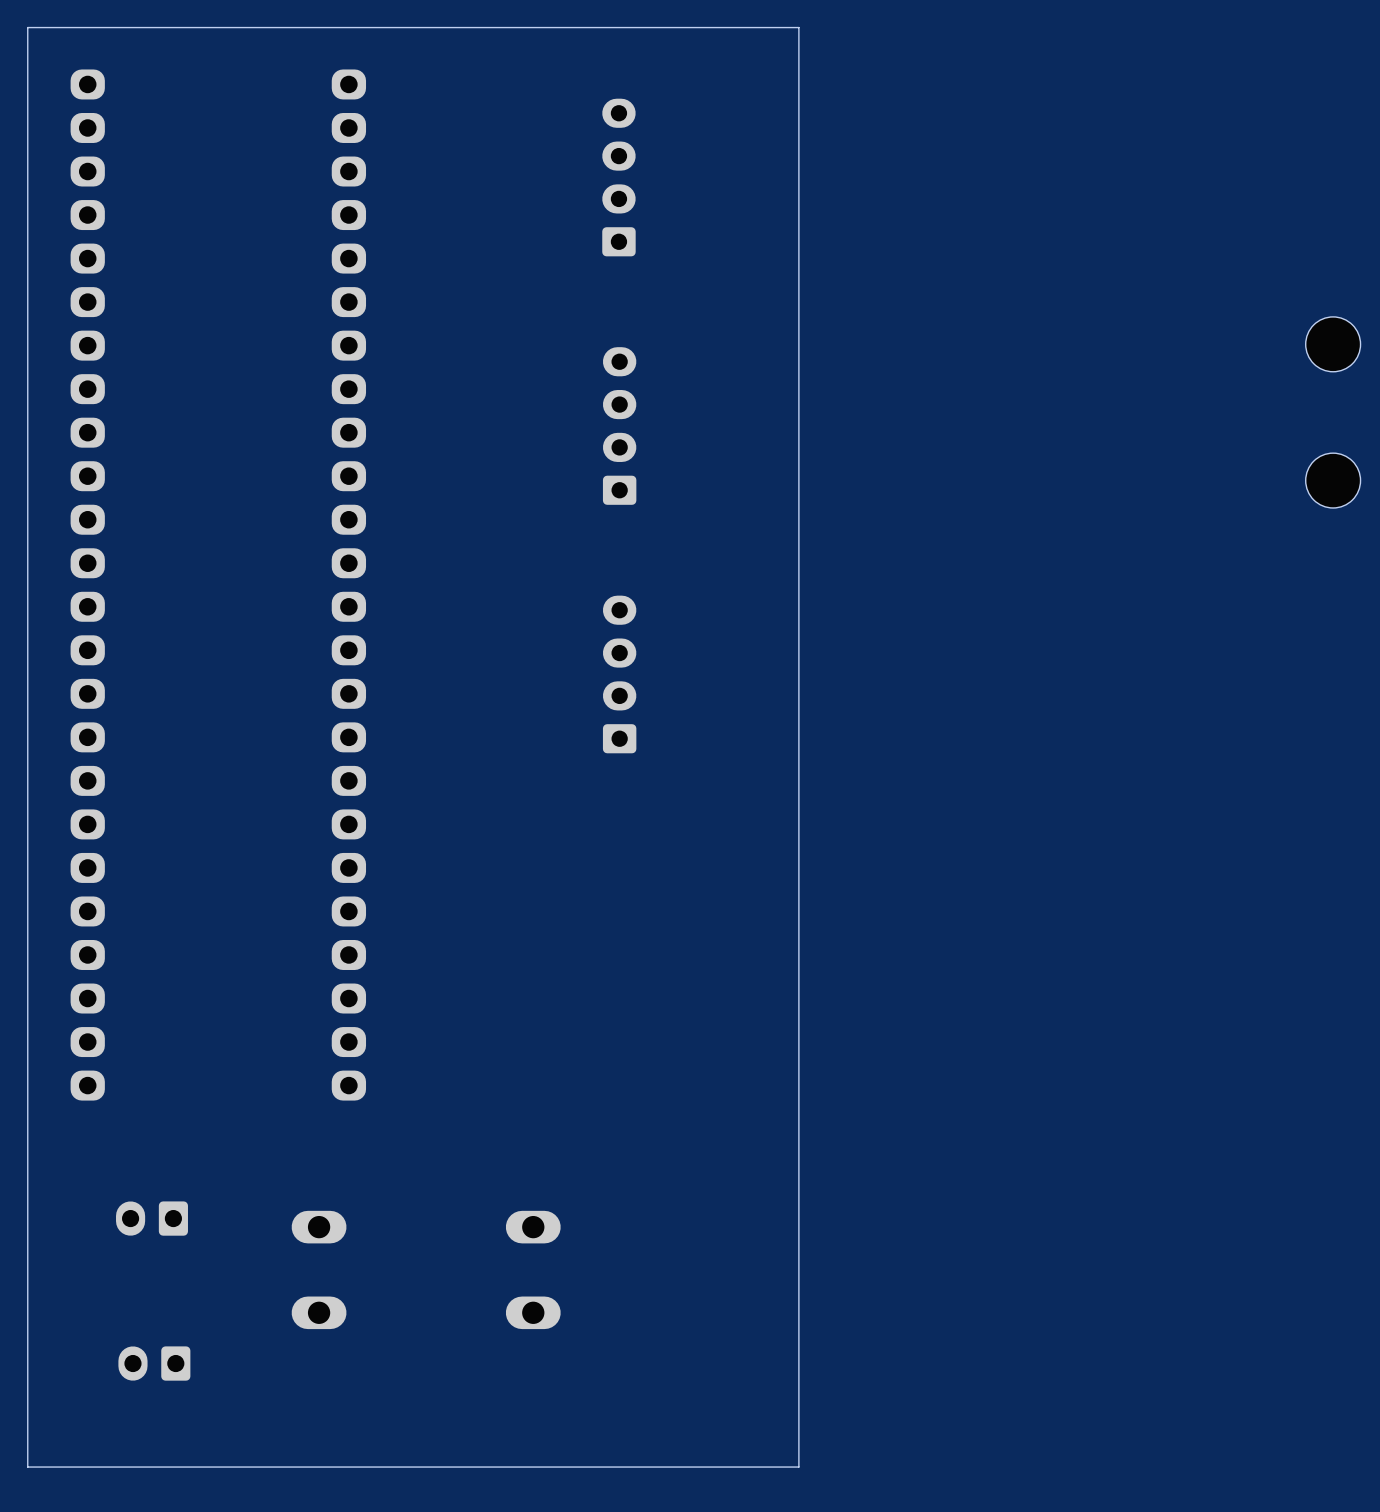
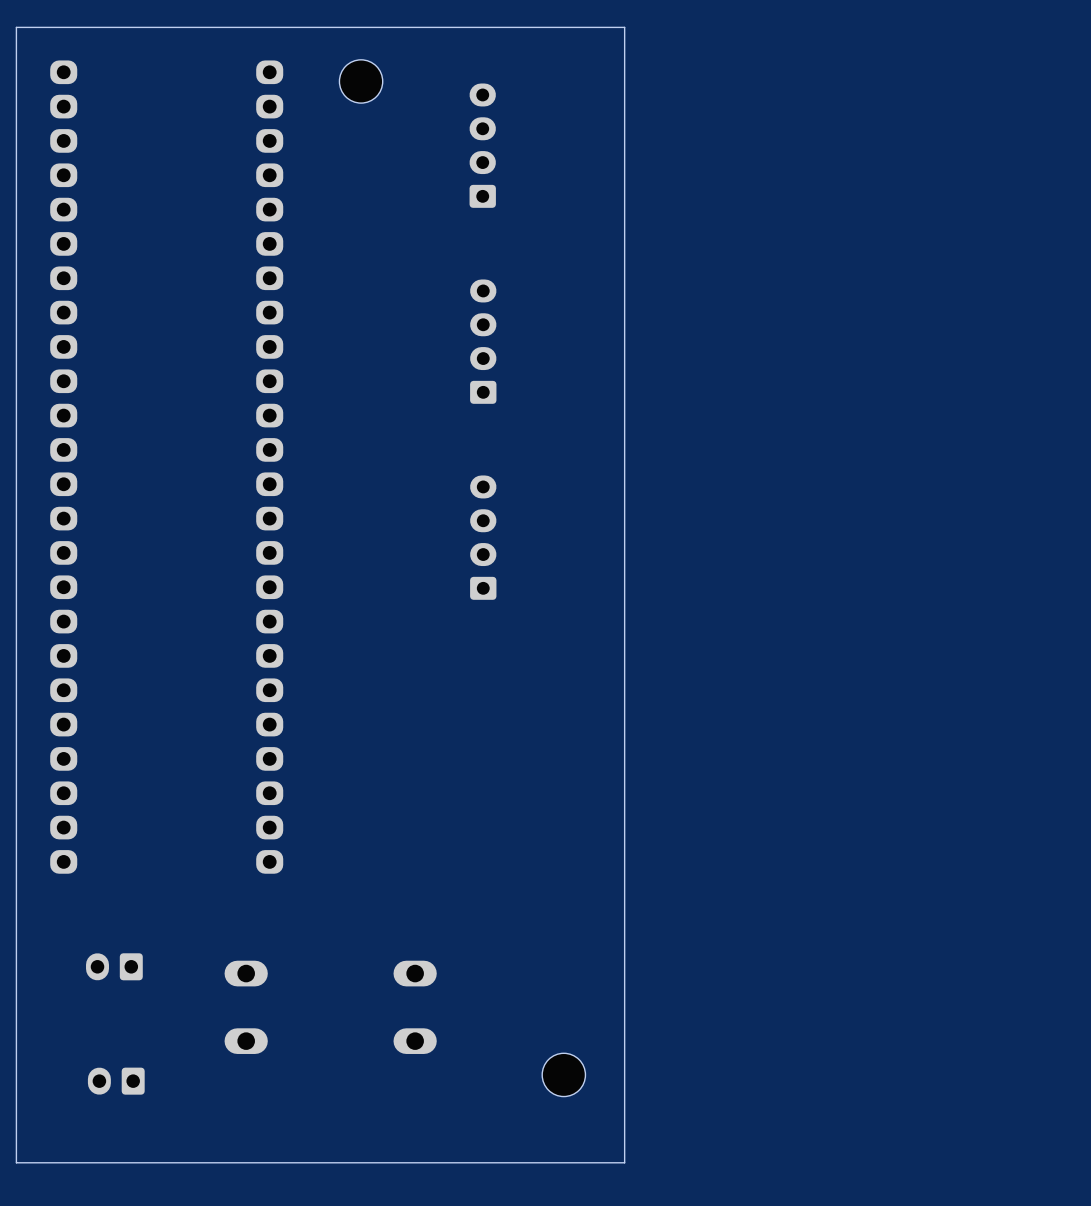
part: none -> (361, 81)
part: (1333, 344) -> none
part: (1333, 480) -> none
part: none -> (563, 1074)

